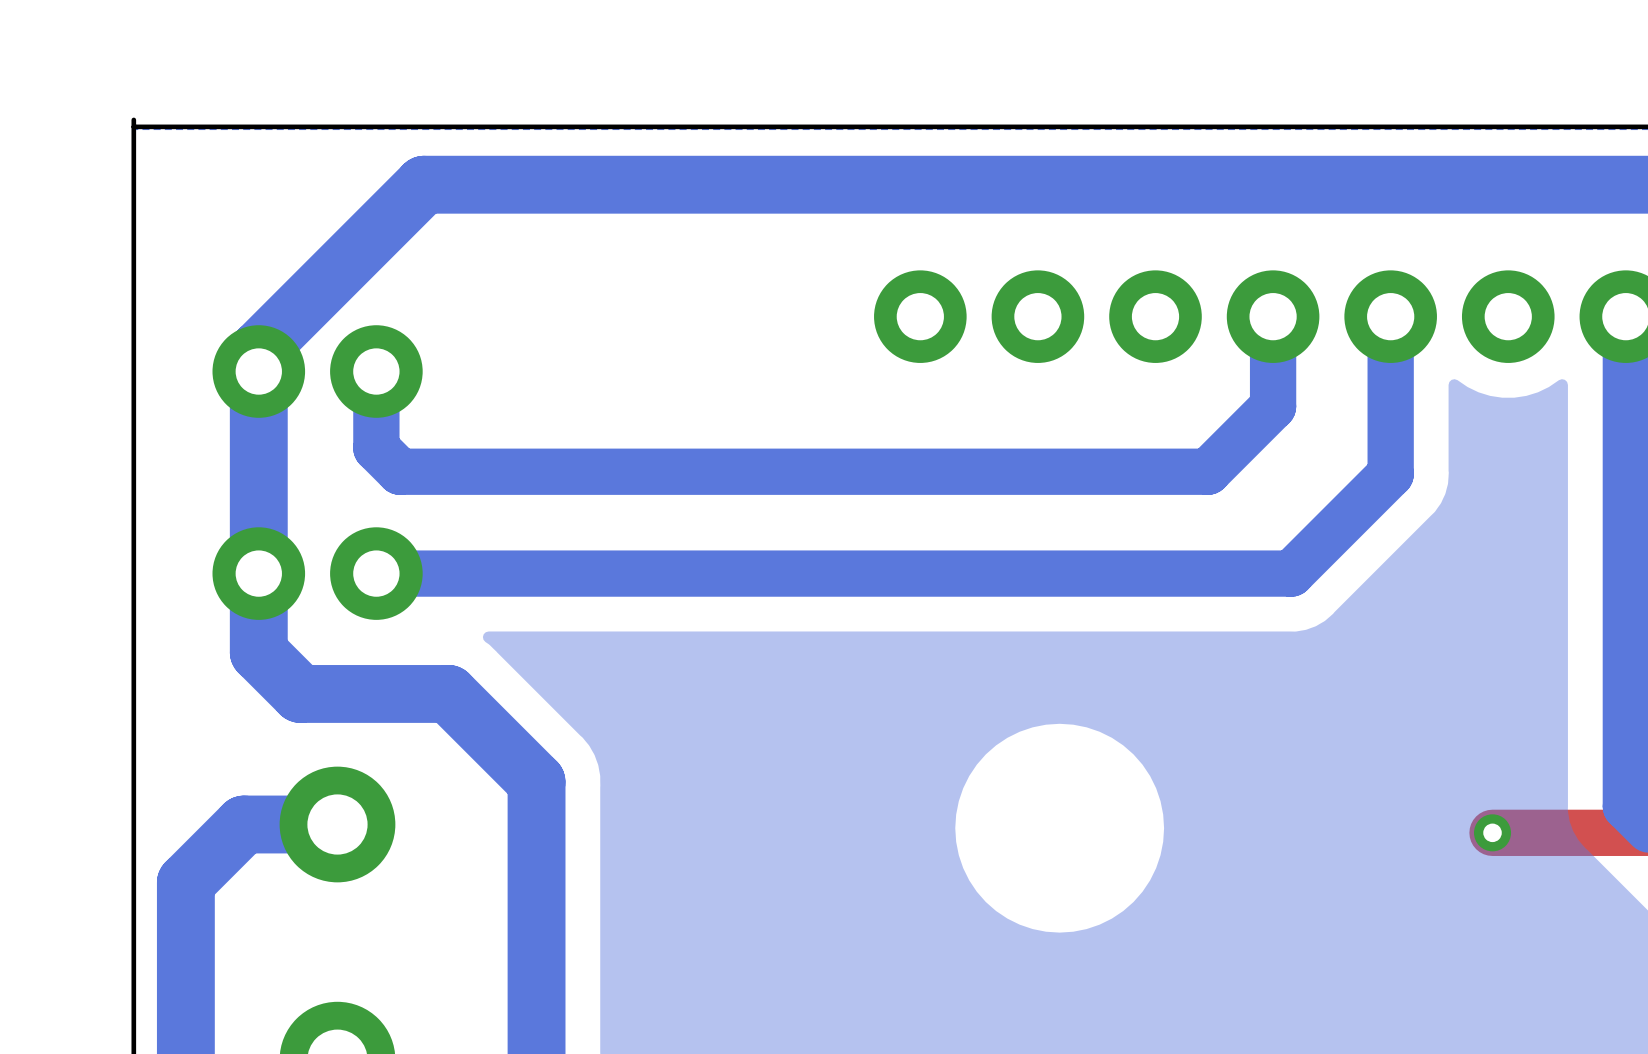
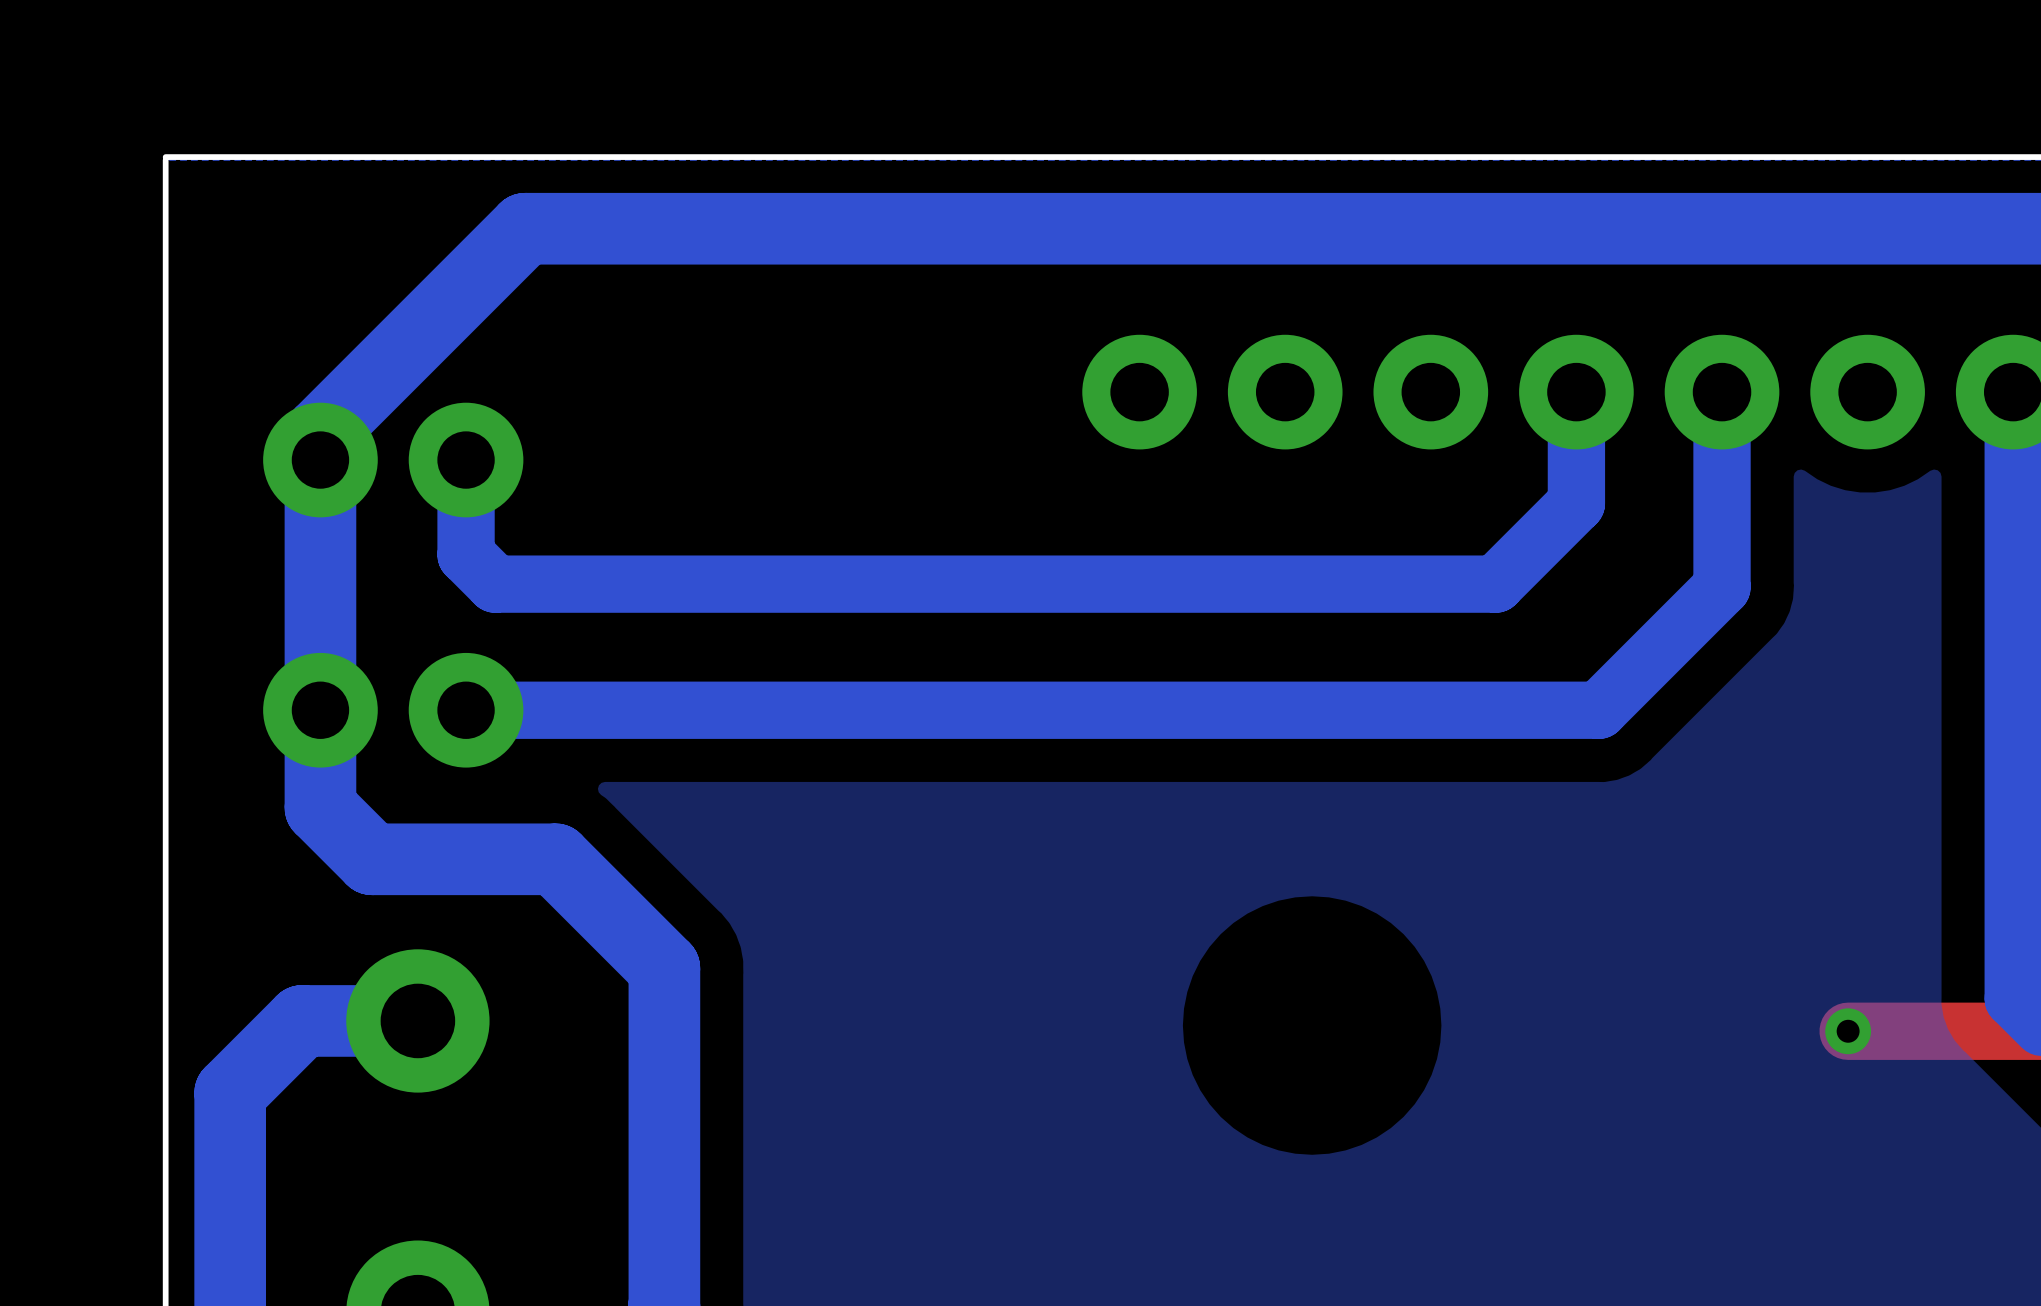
board edge: (133, 119) (133, 129) -> none

